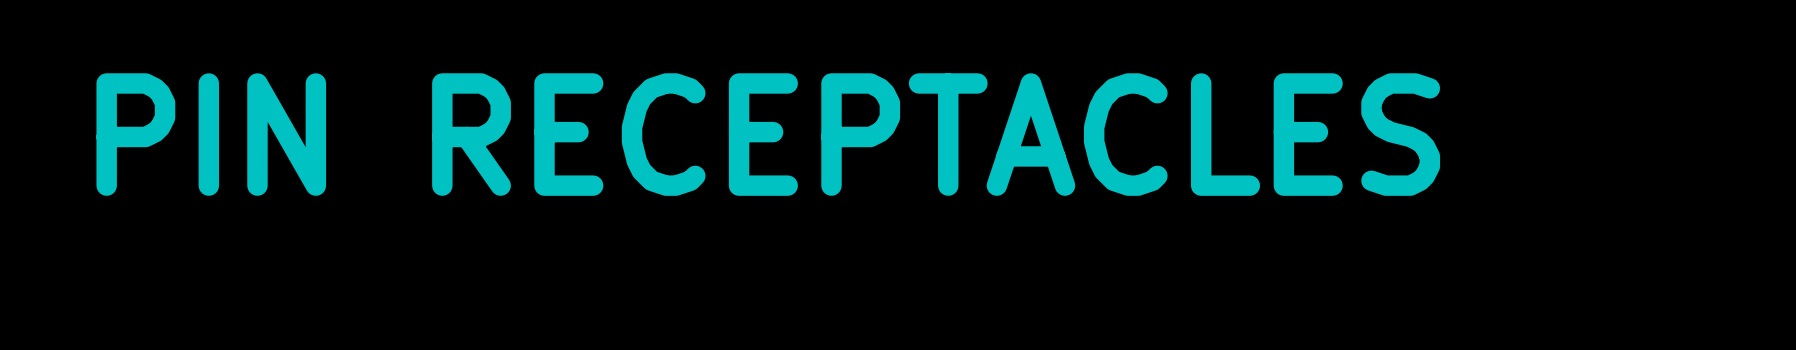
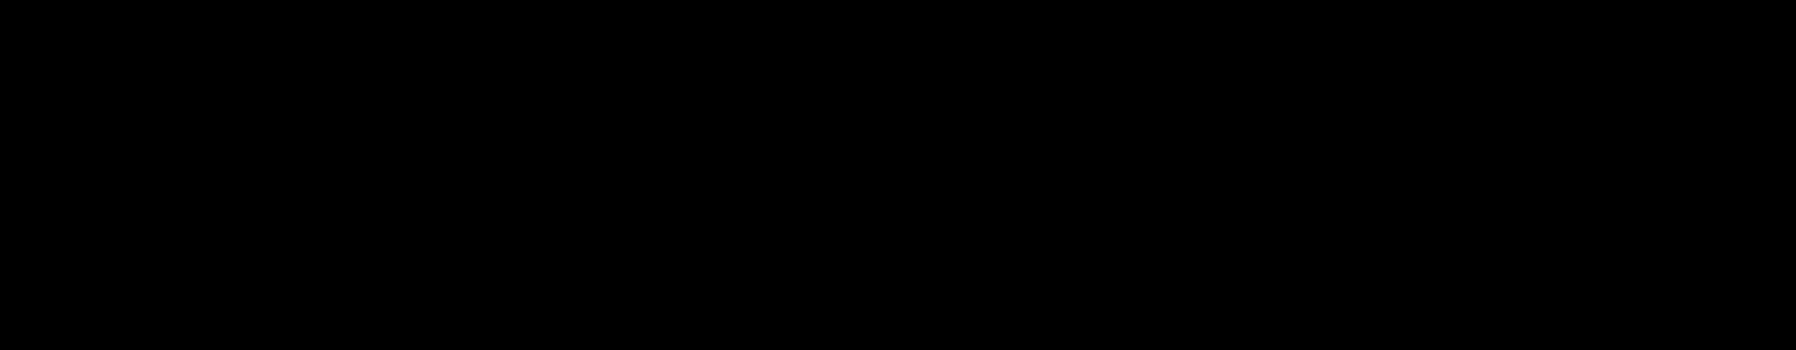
text: PIN RECEPTACLES (768, 134) -> none

